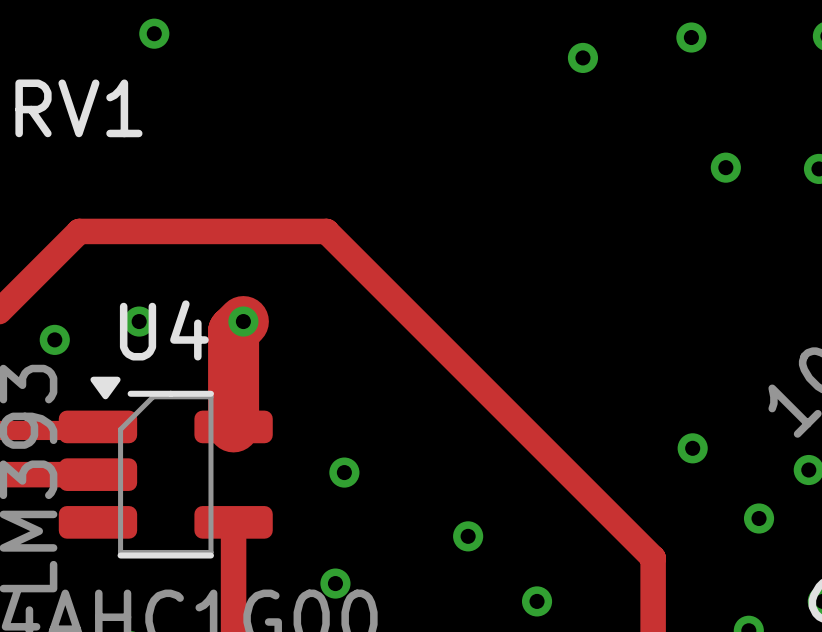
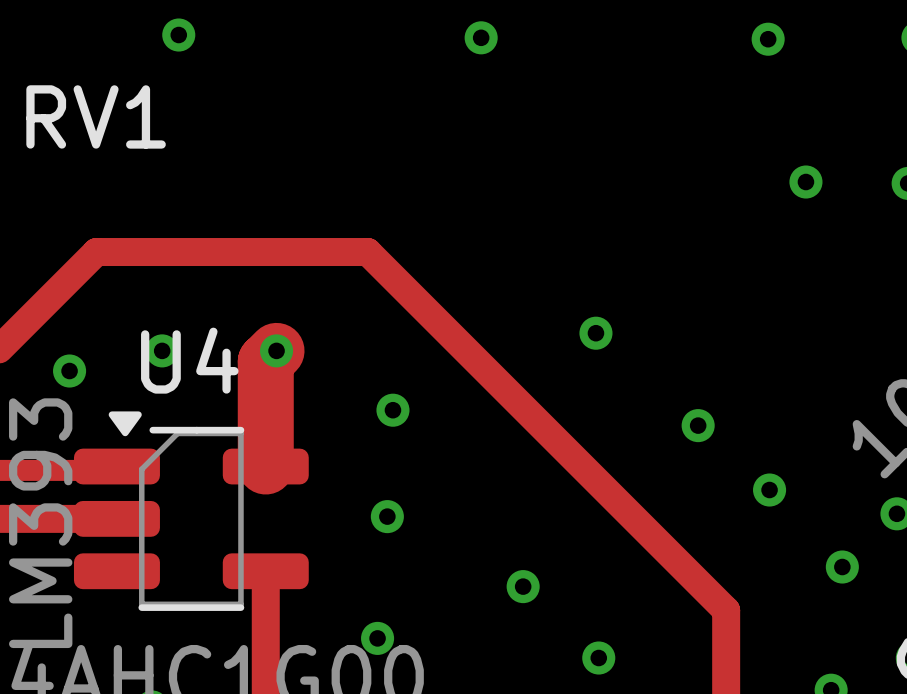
via: none -> (481, 37)
via: (582, 57) -> none
via: none -> (595, 333)
via: none -> (392, 410)
via: none -> (698, 425)

